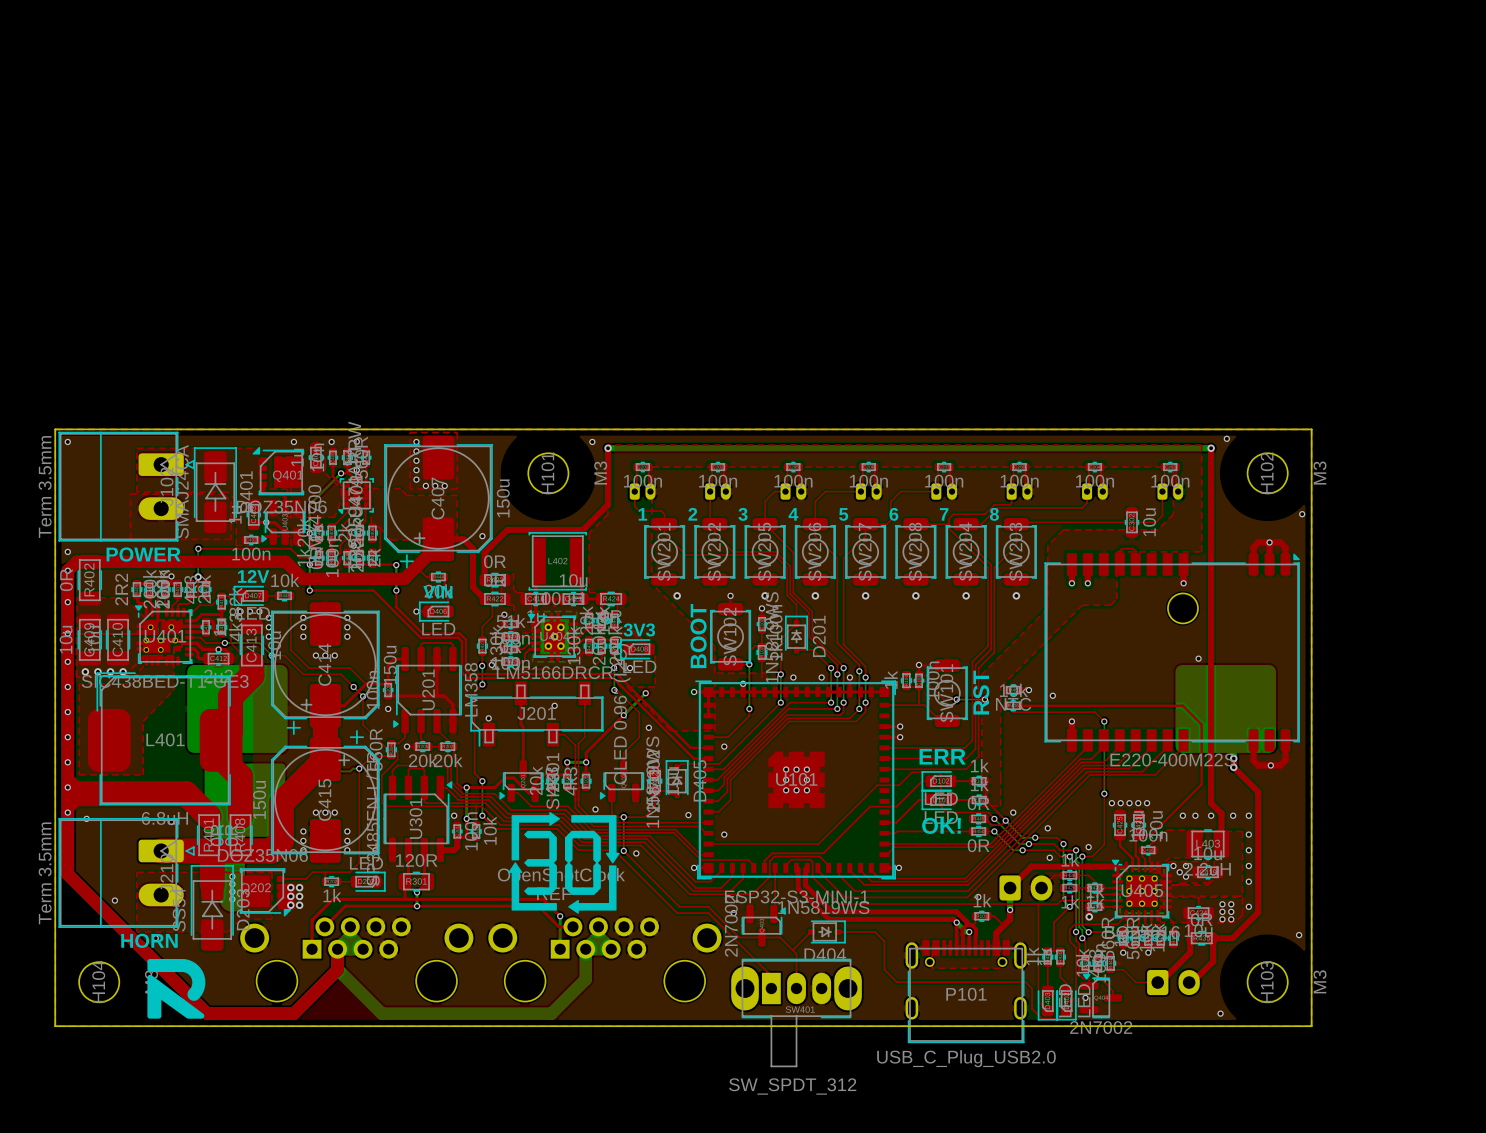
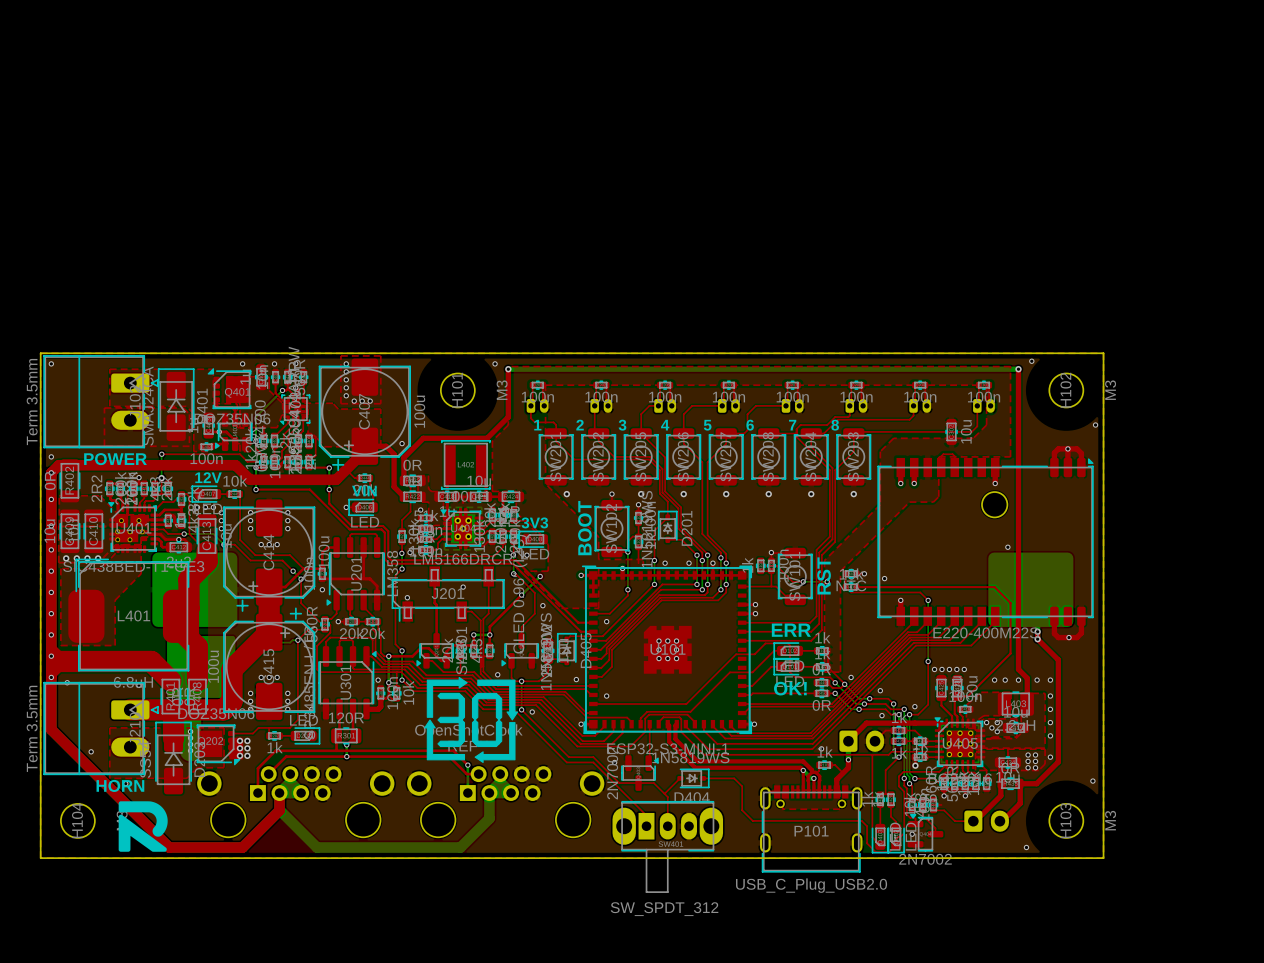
C407 value: 150u (503, 498) -> 100u (419, 411)
C414 value: 150u (390, 664) -> 100u (324, 552)
C415 value: 150u (259, 799) -> 100u (213, 666)

